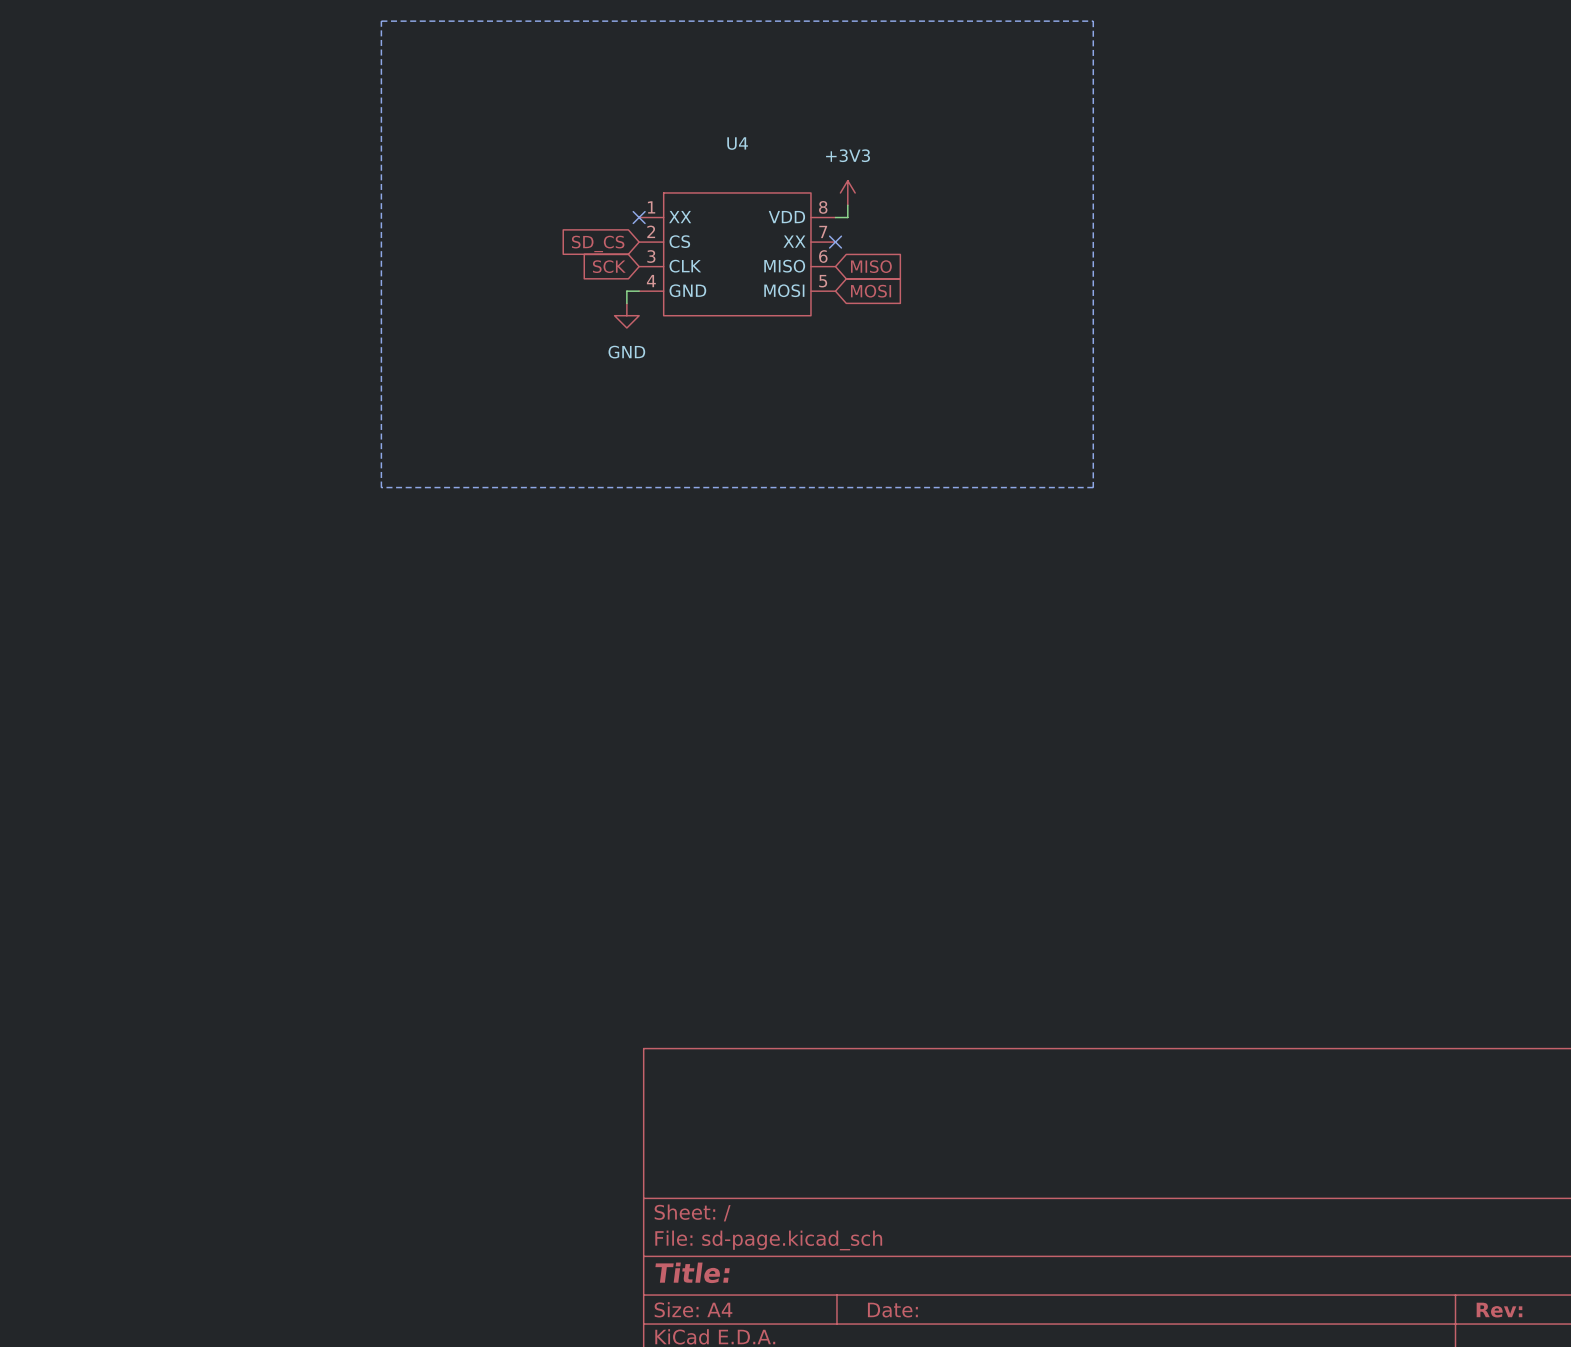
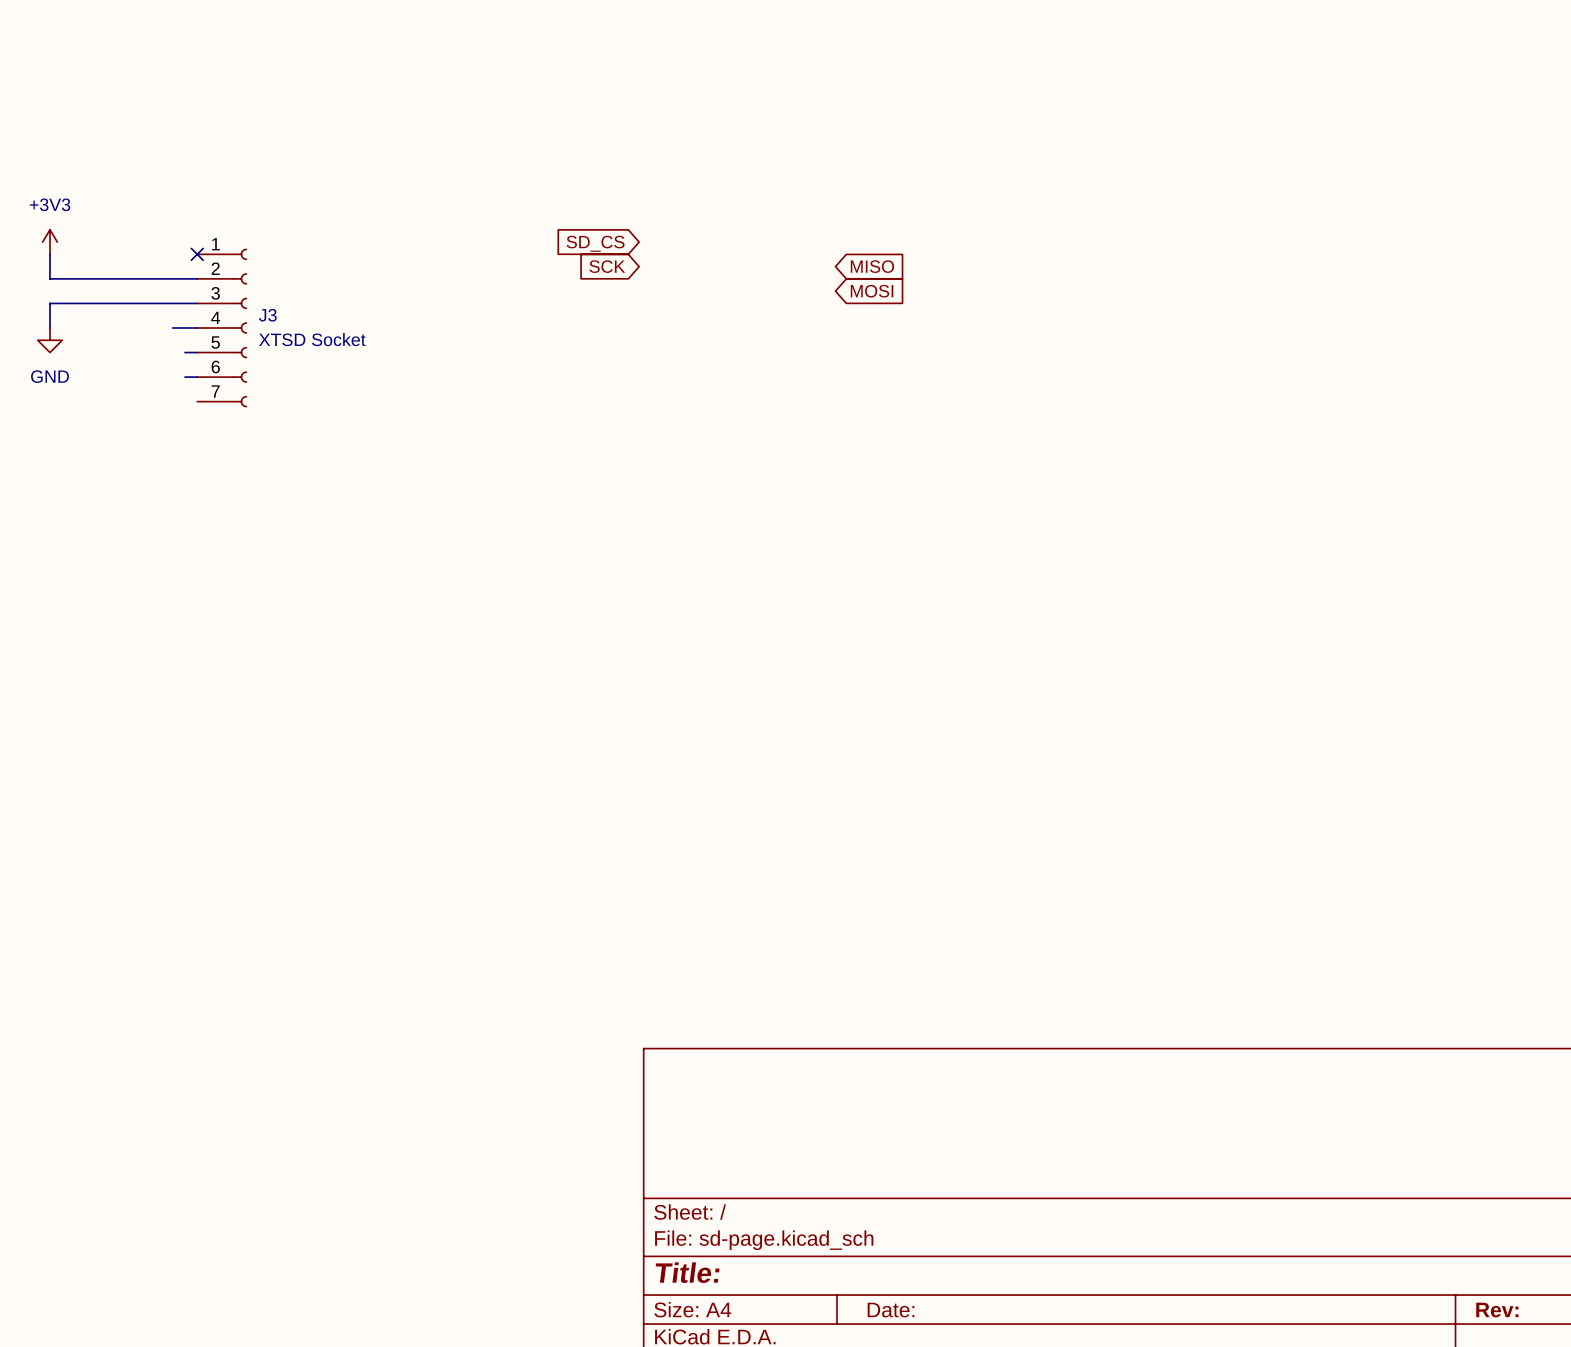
line: (381, 21) (1093, 21) (1093, 487) (381, 487) (381, 21) -> none
power symbol: +3V3 (847, 192) -> none
wire: (847, 205) (847, 217) (835, 217) -> none
no-connect mark: (639, 217) -> none
power symbol: none -> +3V3 (49, 242)
no-connect mark: (835, 242) -> none
wire: none -> (49, 254) (49, 278) (197, 278)
no-connect mark: none -> (197, 254)
U4: (737, 254) -> none
wire: (639, 291) (626, 291) (626, 303) -> none
wire: none -> (197, 303) (49, 303) (49, 327)
power symbol: GND (626, 315) -> none
wire: none -> (172, 327) (197, 327)
J3: none -> XTSD Socket (222, 327)
power symbol: none -> GND (49, 340)
wire: none -> (185, 352) (197, 352)
wire: none -> (185, 377) (197, 377)

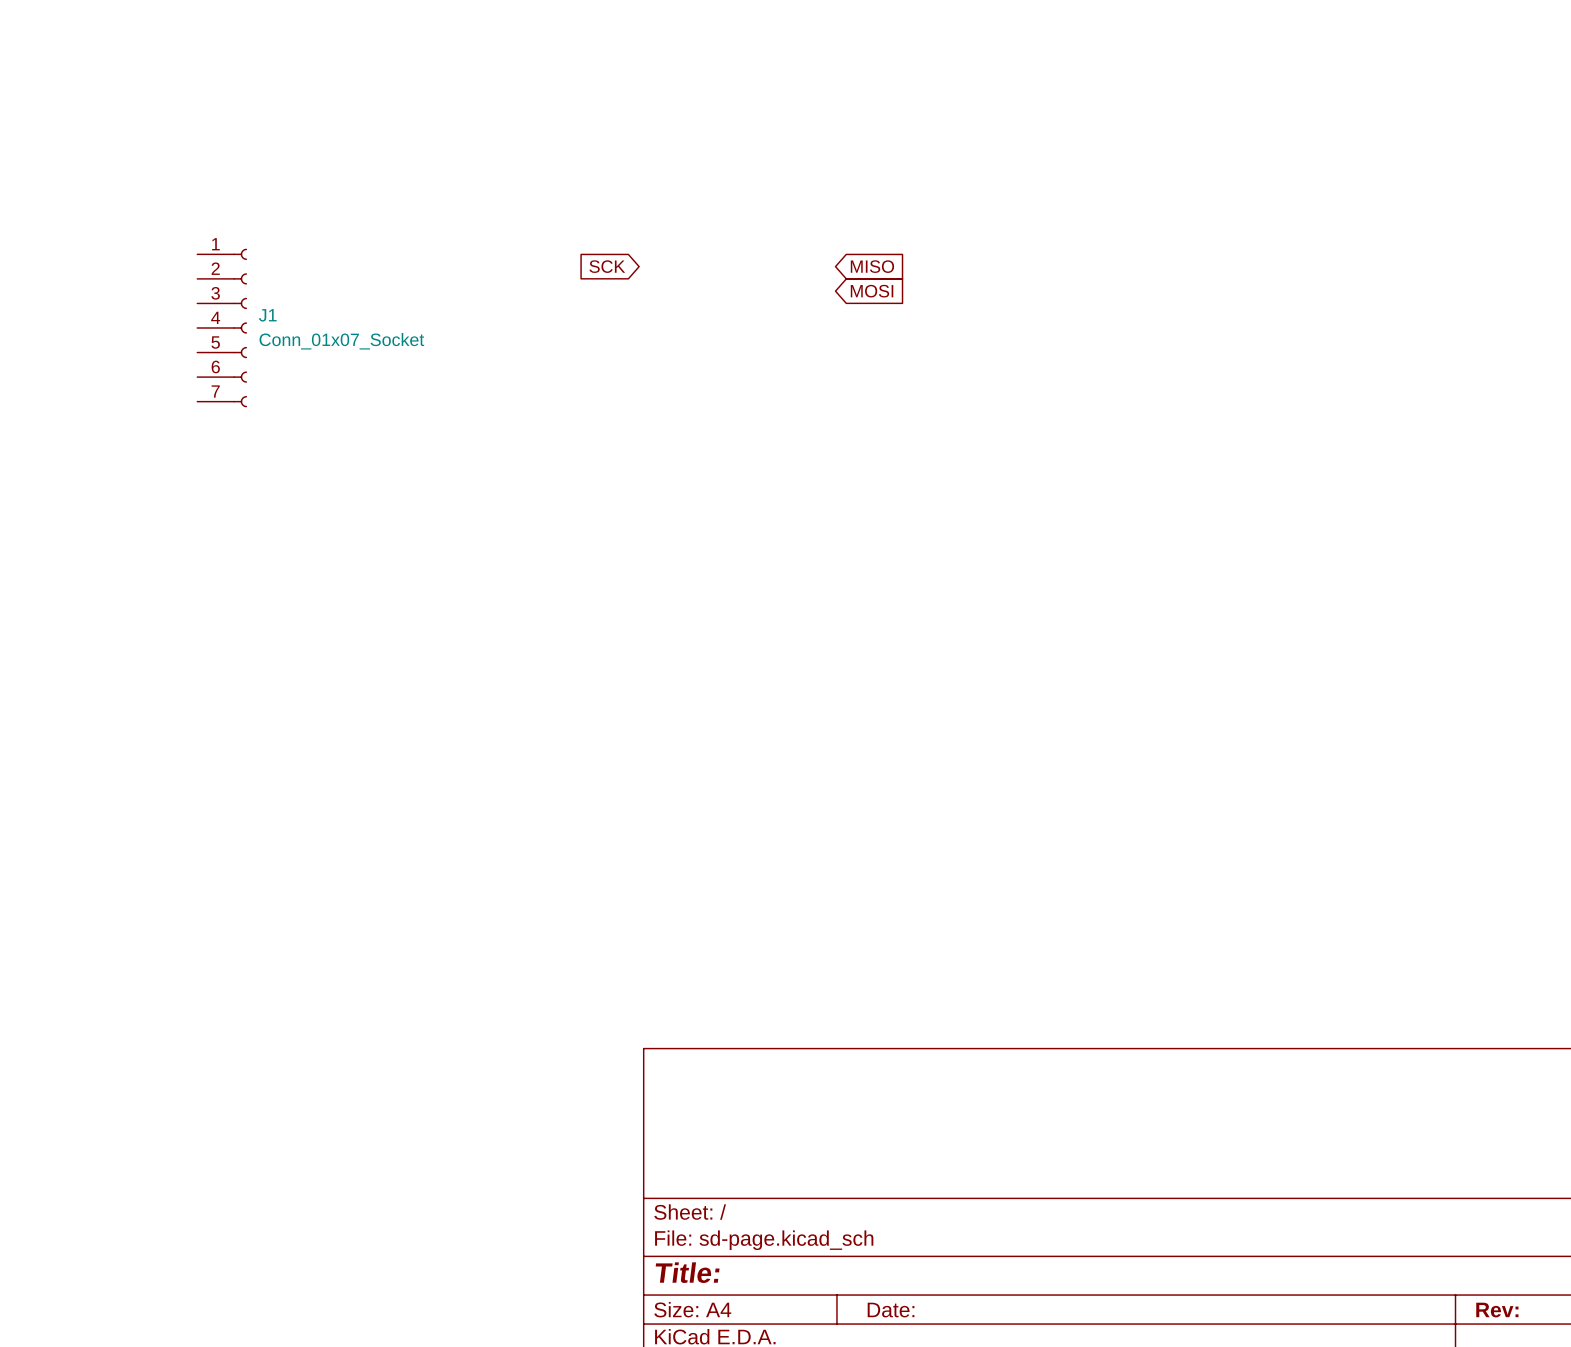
power symbol: +3V3 (49, 242) -> none
global label: SD_CS (595, 243) -> none
wire: (49, 254) (49, 278) (197, 278) -> none
no-connect mark: (197, 254) -> none
wire: (197, 303) (49, 303) (49, 327) -> none
J3 name: J3 (267, 315) -> J1 (267, 315)
wire: (172, 327) (197, 327) -> none
J3 value: XTSD Socket (312, 339) -> Conn_01x07_Socket (341, 341)
power symbol: GND (49, 340) -> none
wire: (185, 352) (197, 352) -> none
wire: (185, 377) (197, 377) -> none

